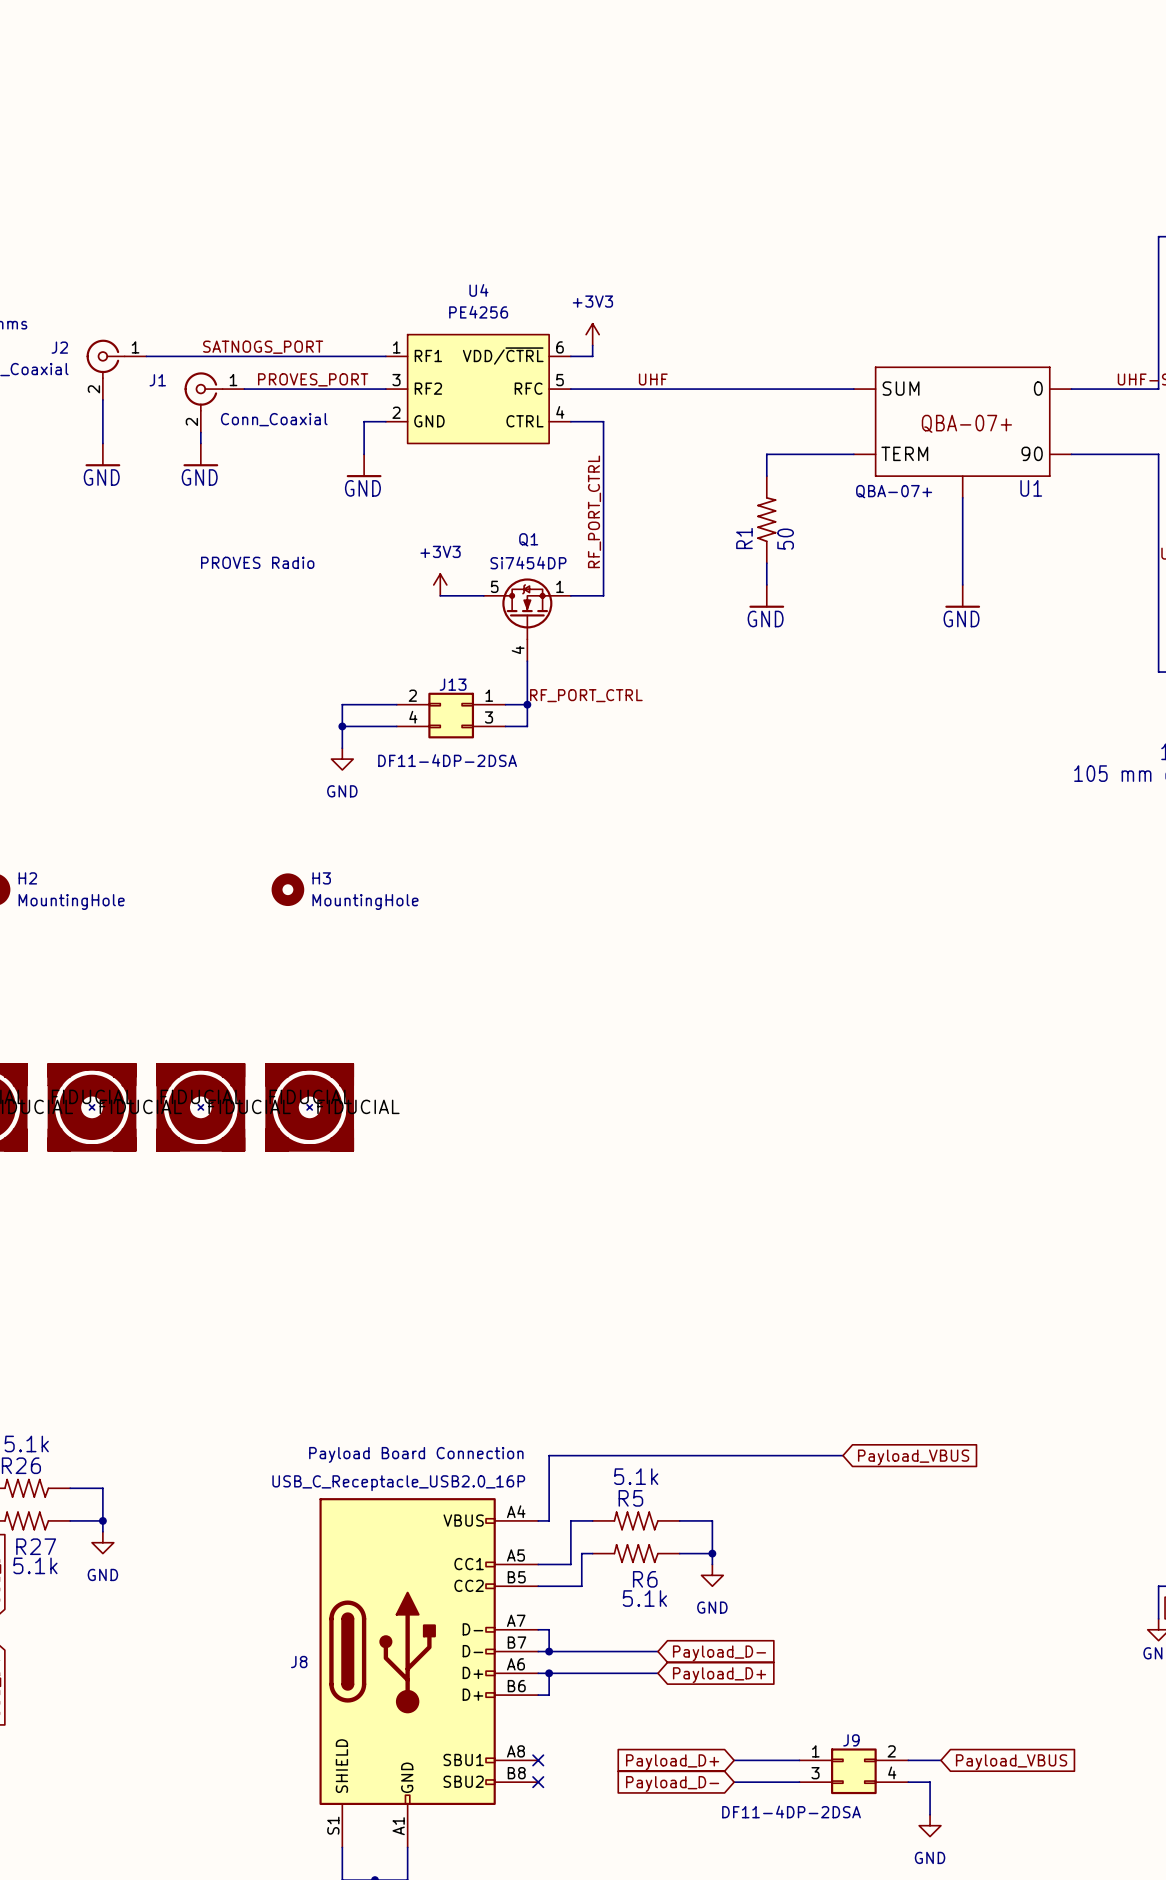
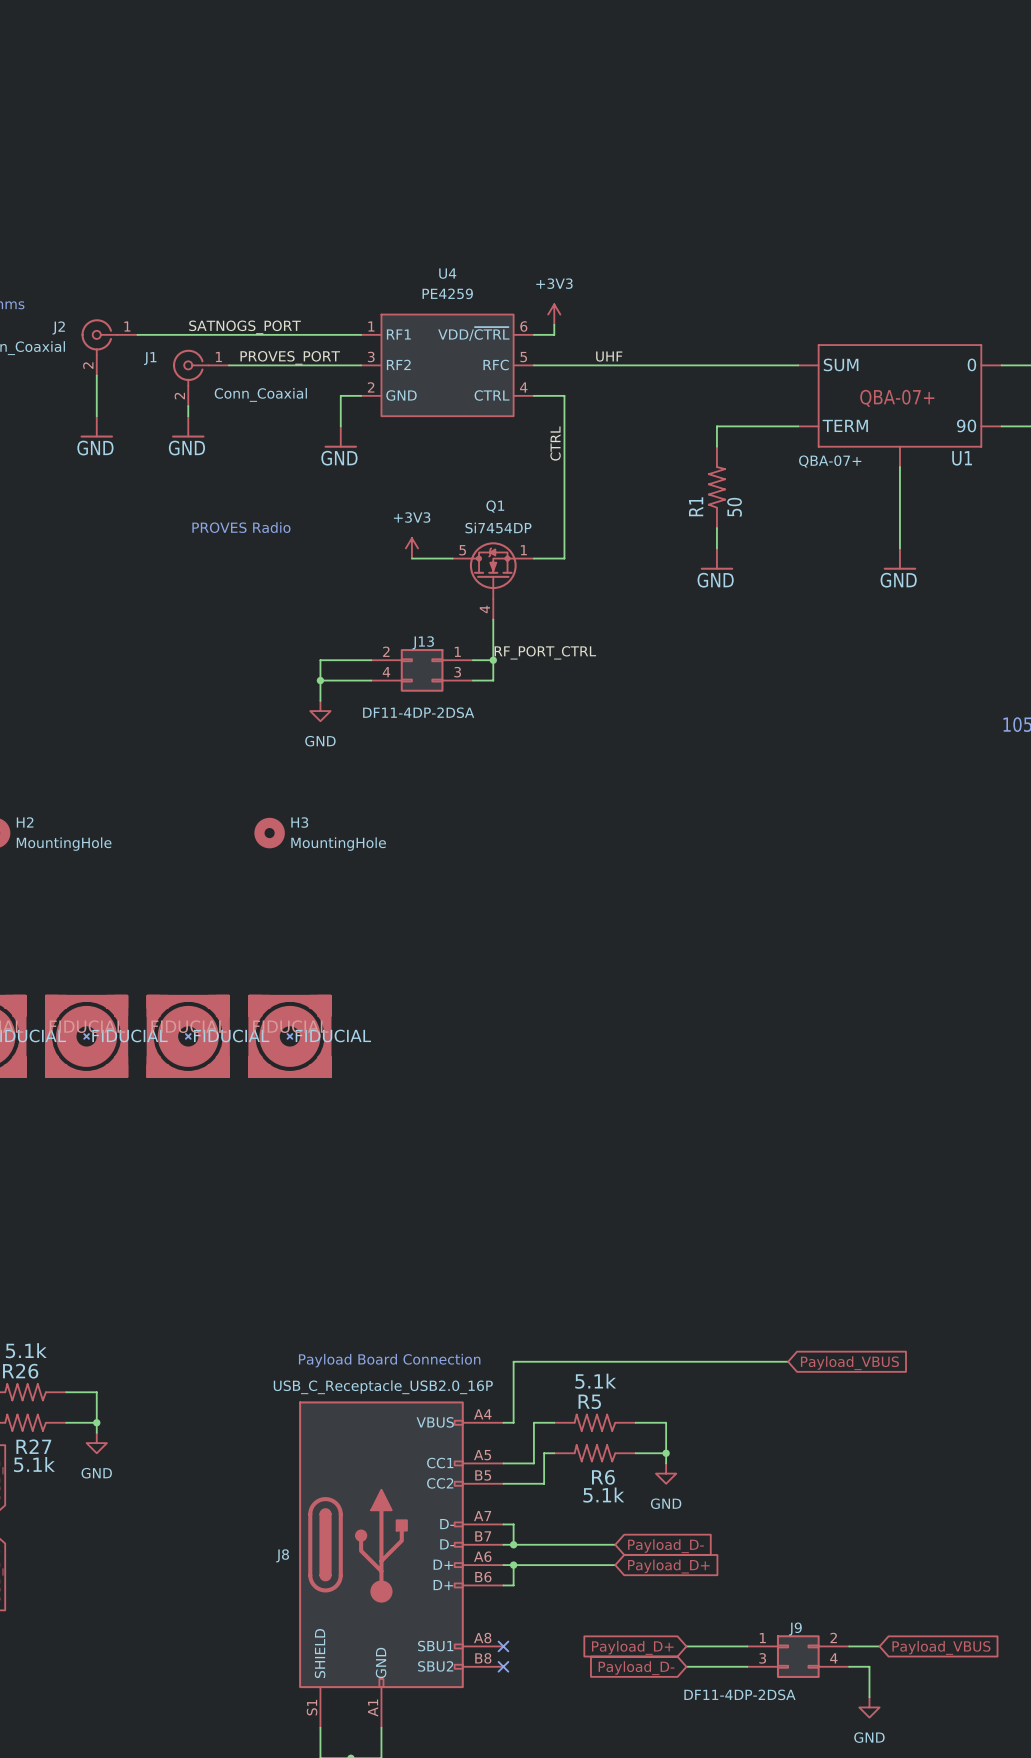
U4 value: PE4256 (478, 312) -> PE4259 (447, 293)
label: RF_PORT_CTRL (594, 511) -> CTRL (555, 443)

